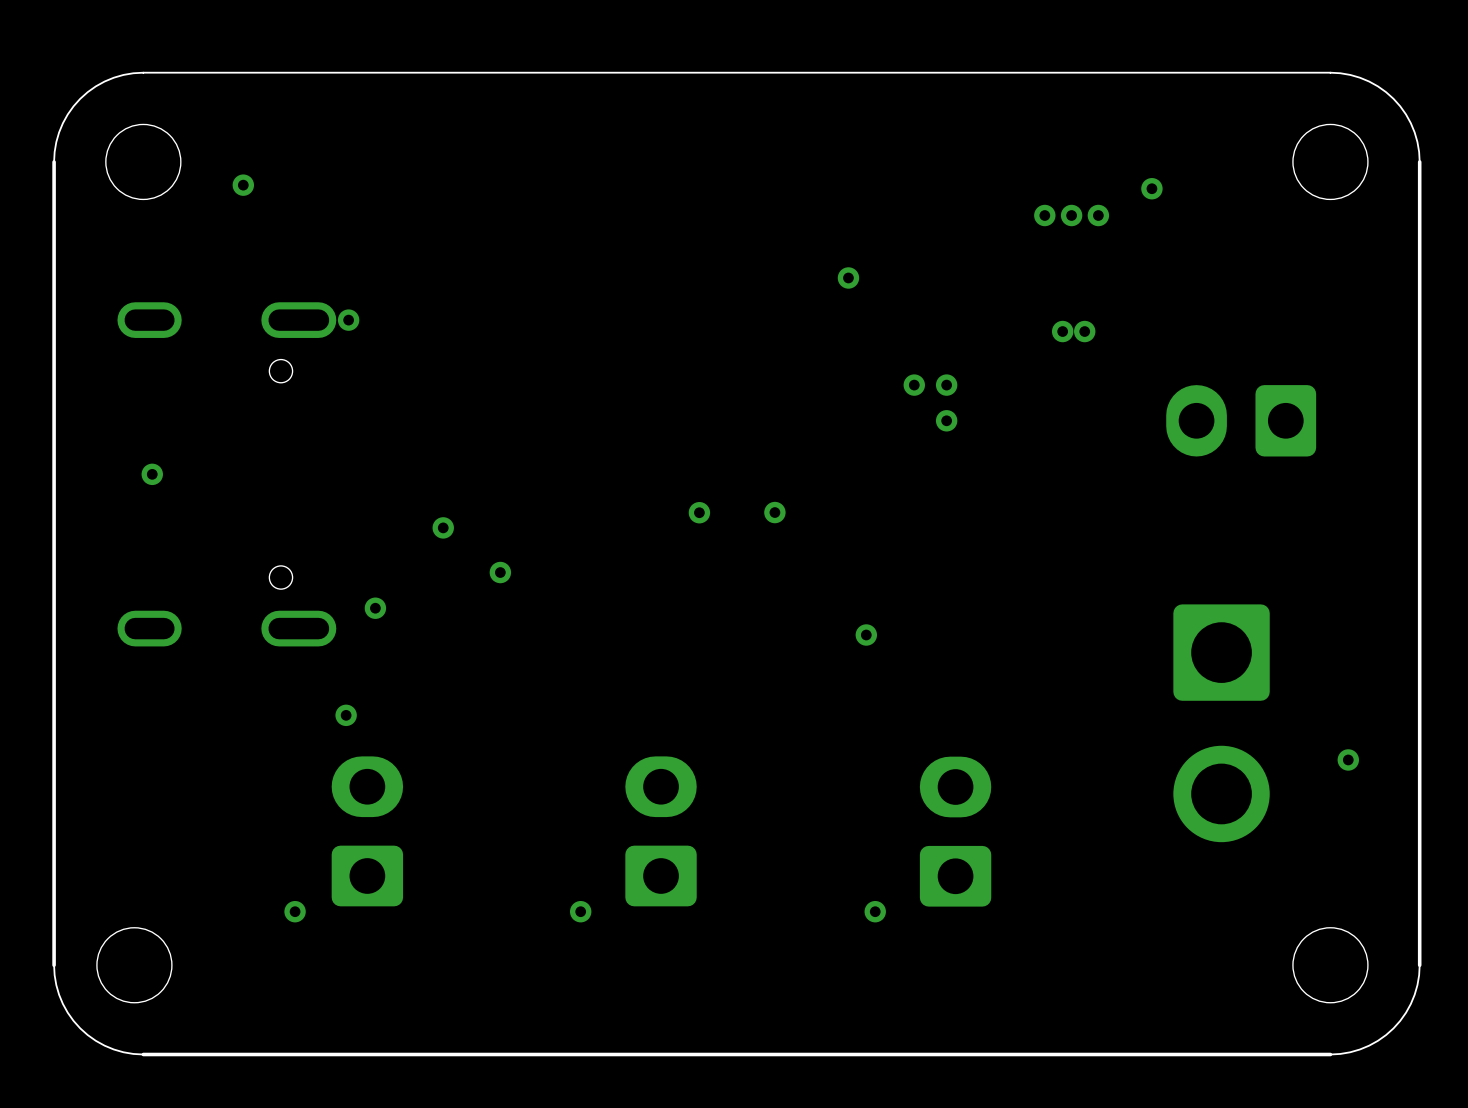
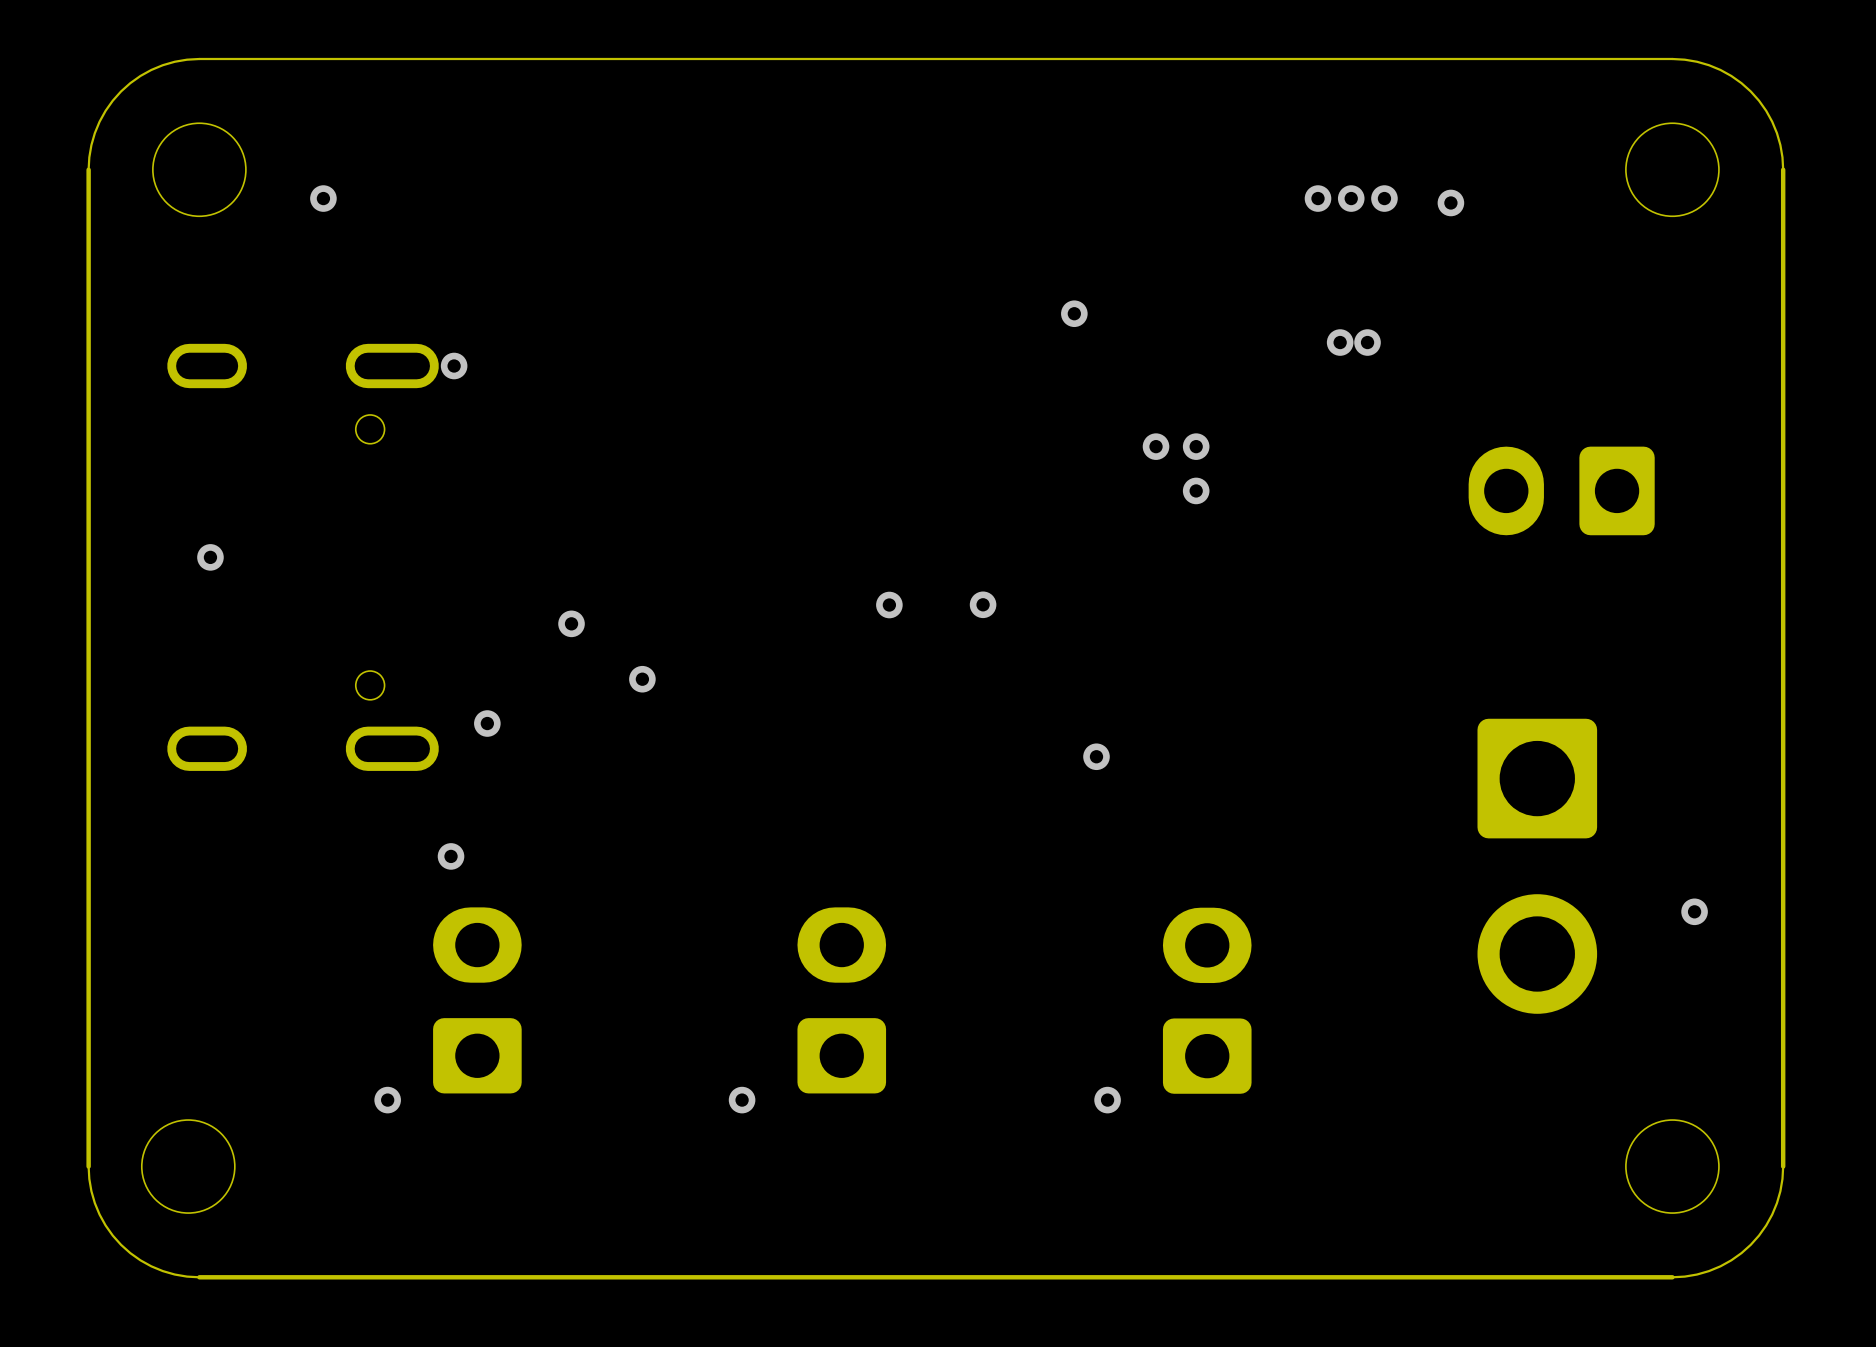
via: none -> (1318, 198)
via: none -> (1351, 198)
via: none -> (1384, 198)
via: (1044, 215) -> none
via: (1071, 215) -> none
via: (1098, 215) -> none
via: none -> (1340, 342)
via: none -> (1367, 342)
via: (1062, 331) -> none
via: (1084, 331) -> none

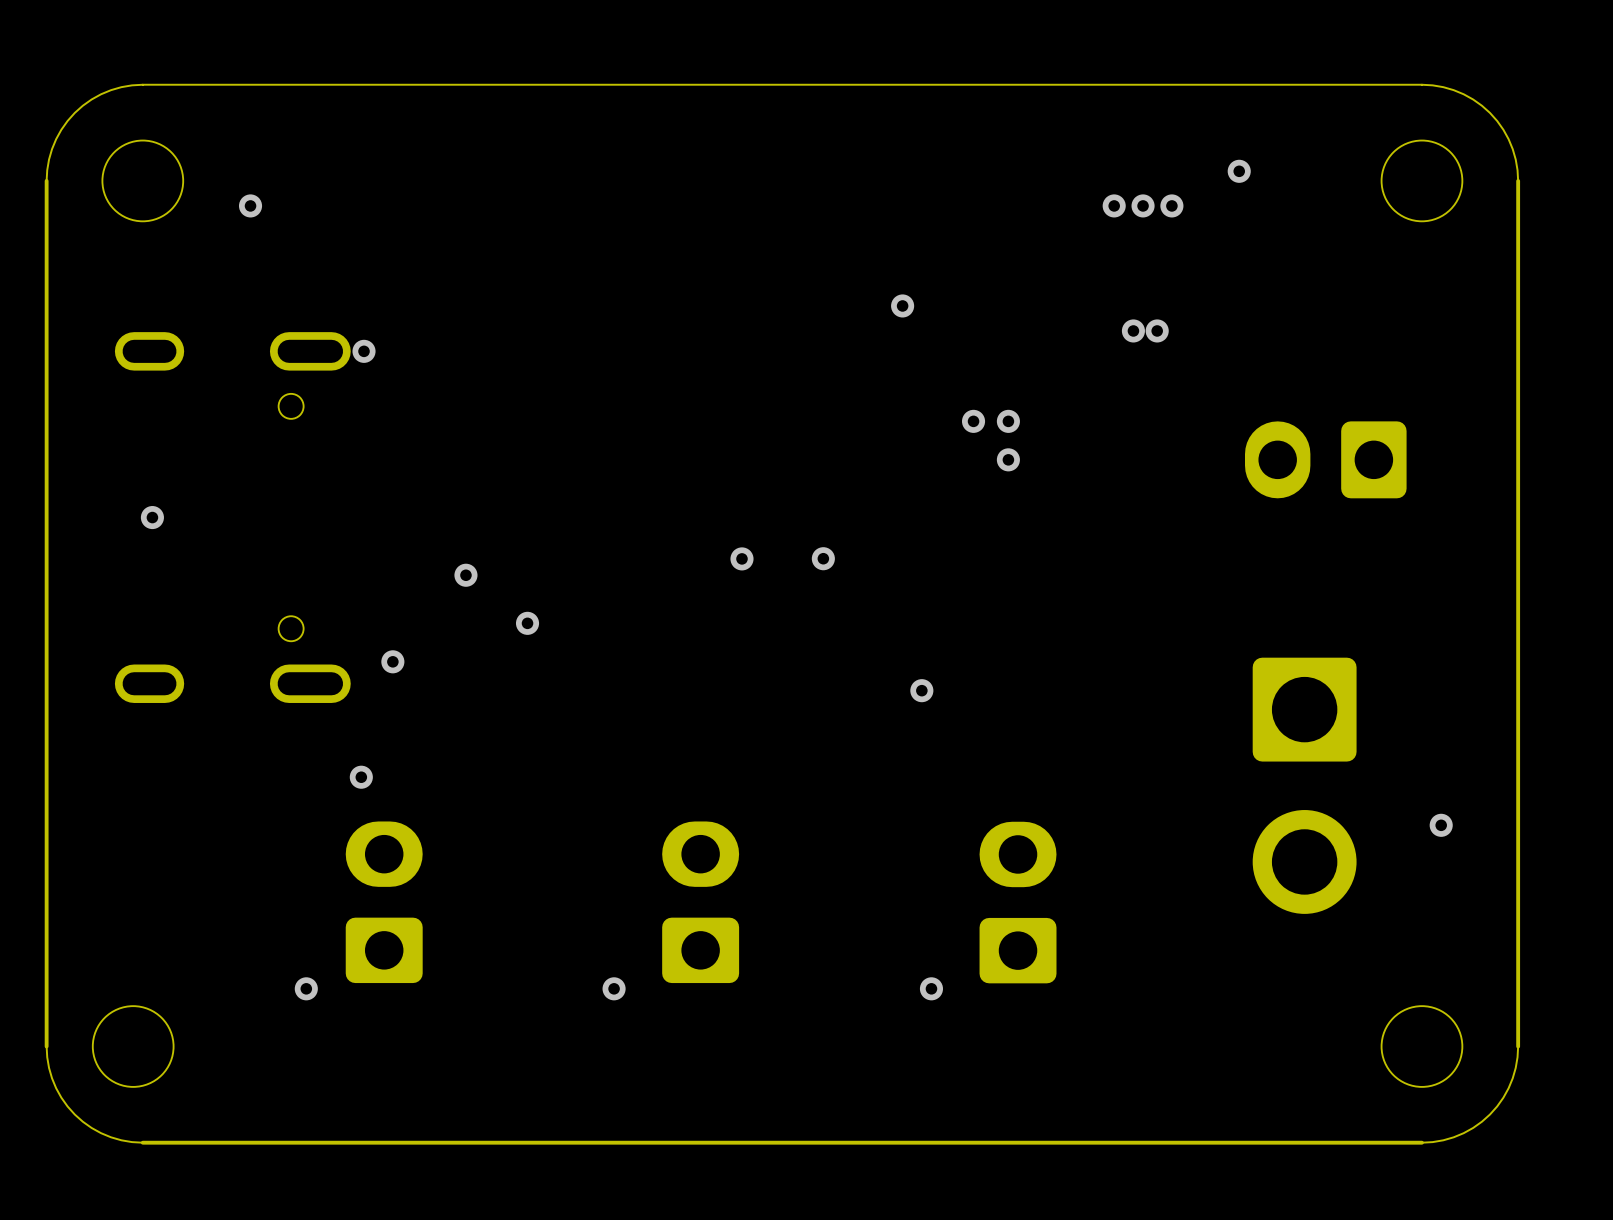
via position: (1450, 202) -> (1239, 171)

